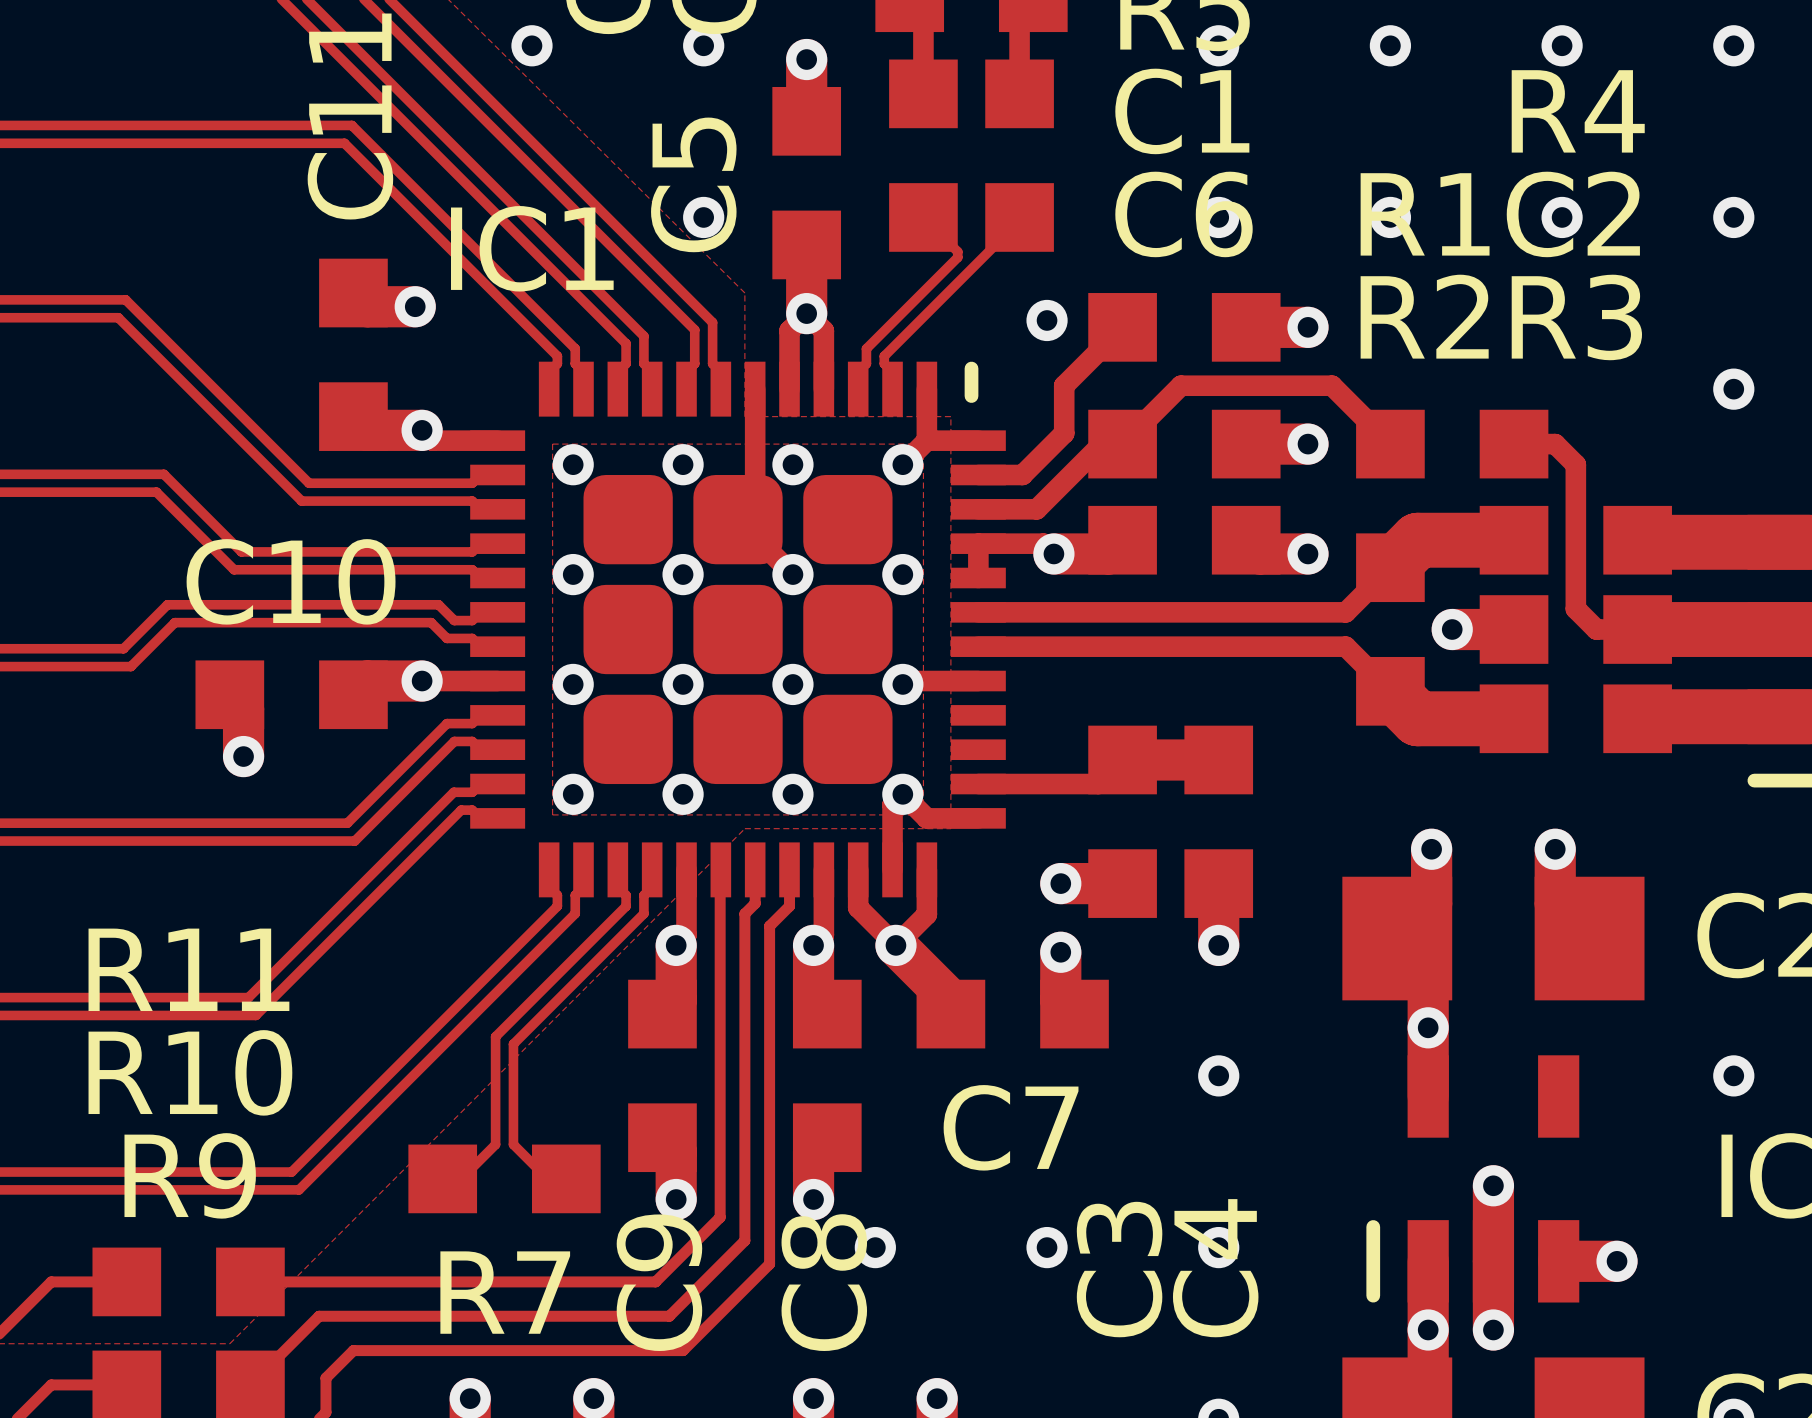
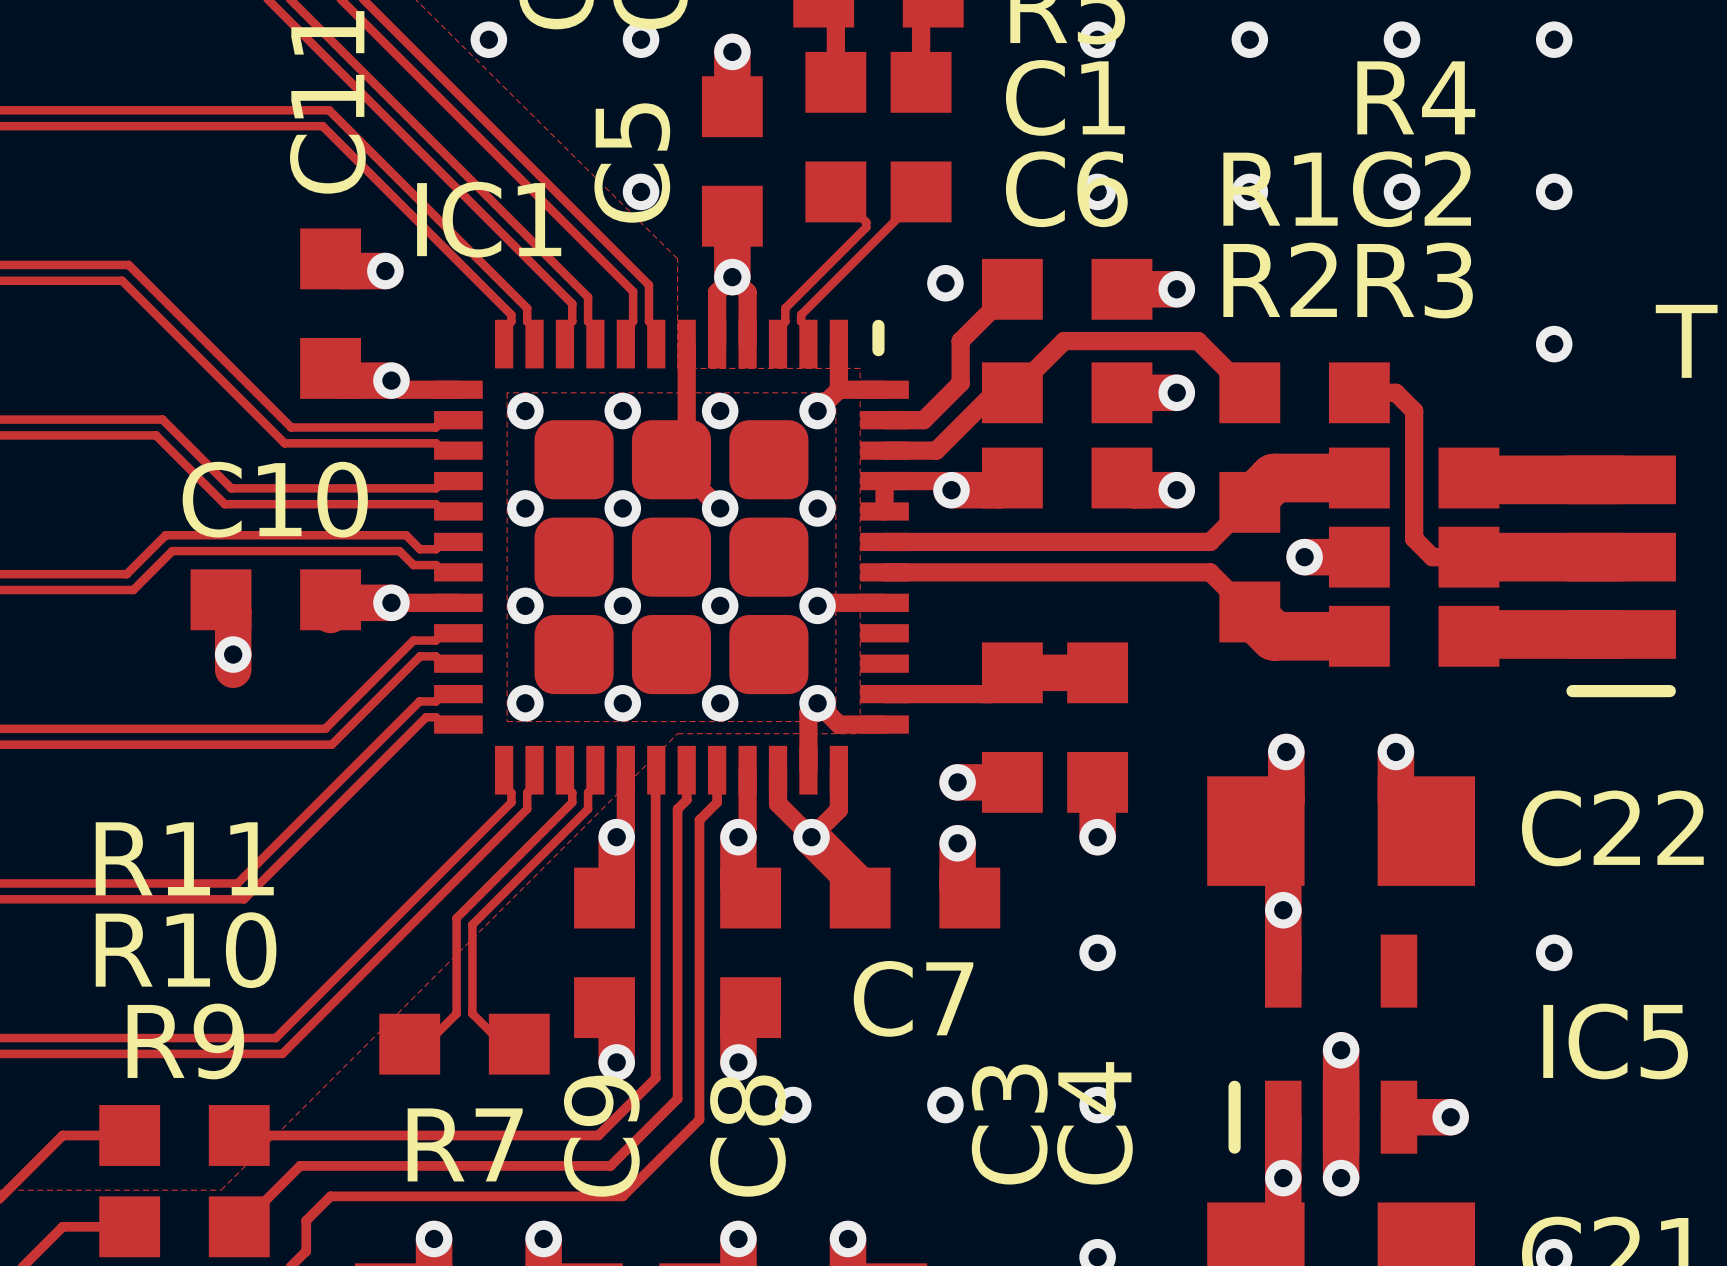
C10 position: (291, 694) -> (275, 599)
via position: (243, 756) -> (233, 654)

